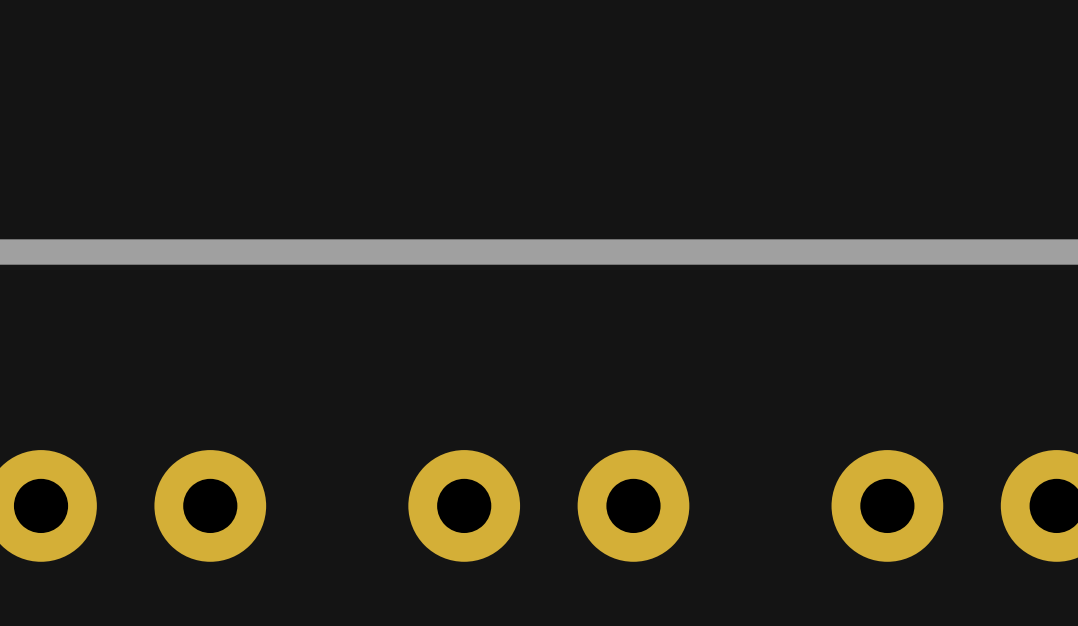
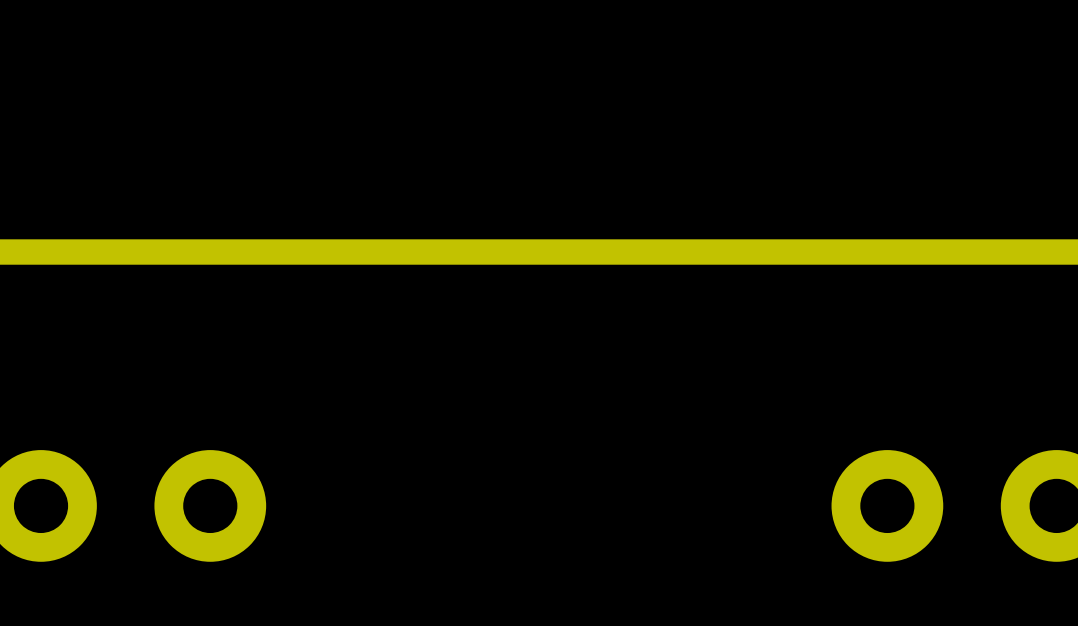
part: (548, 505) -> none

